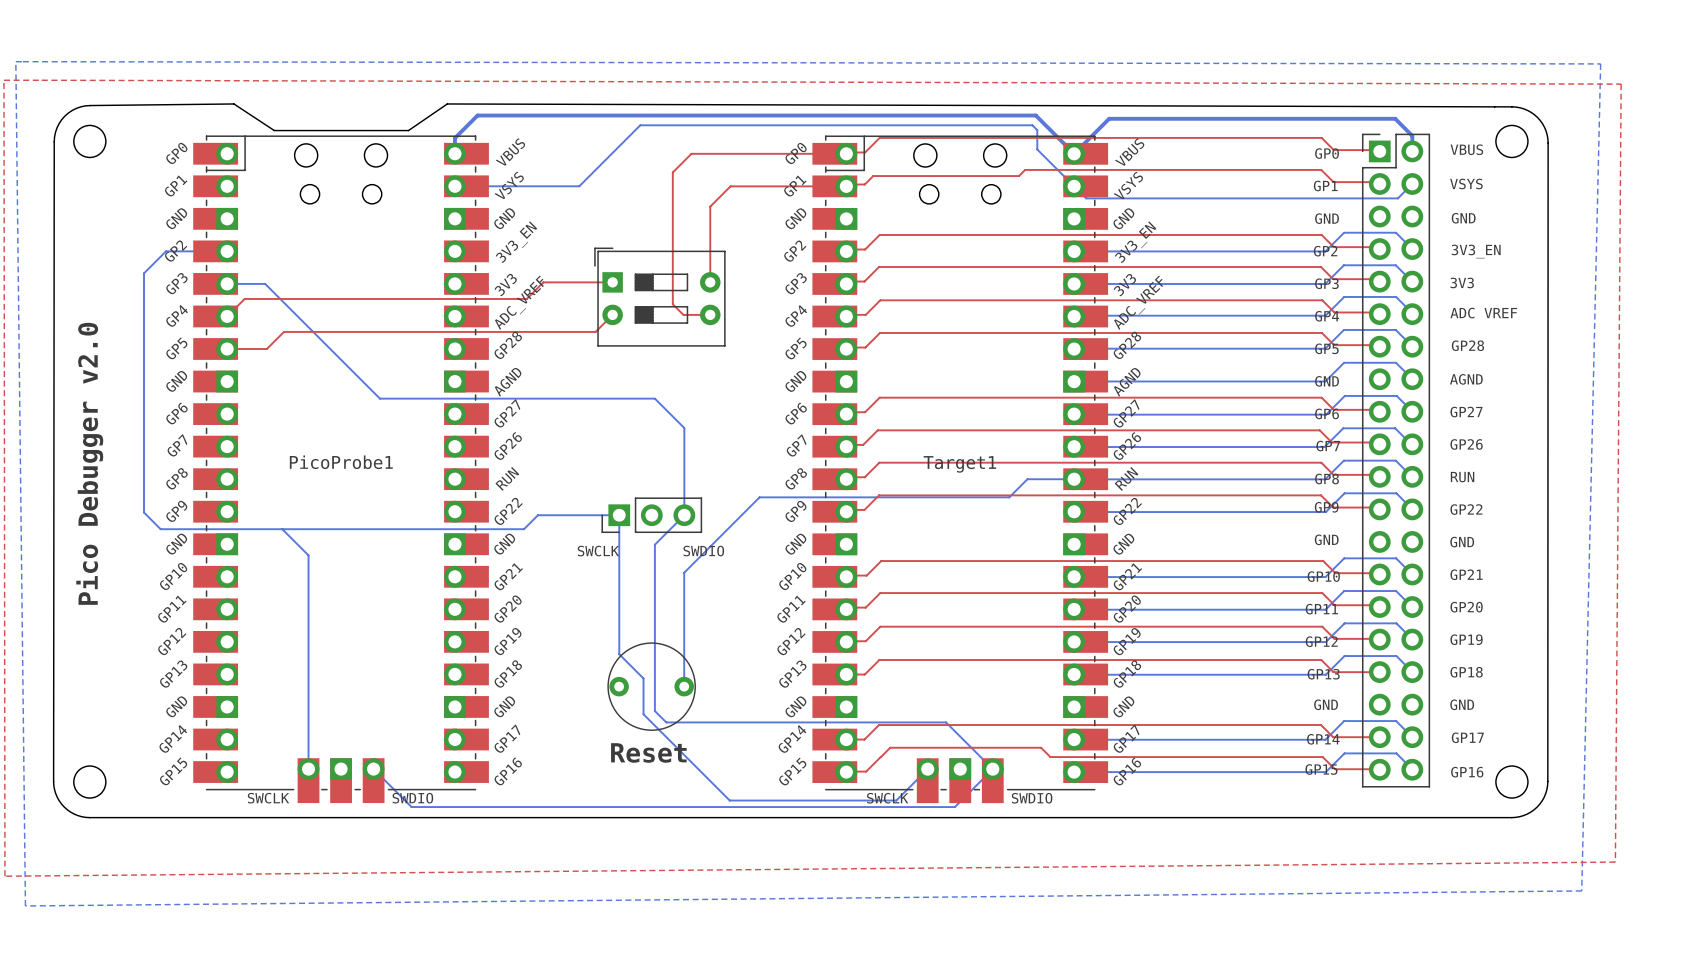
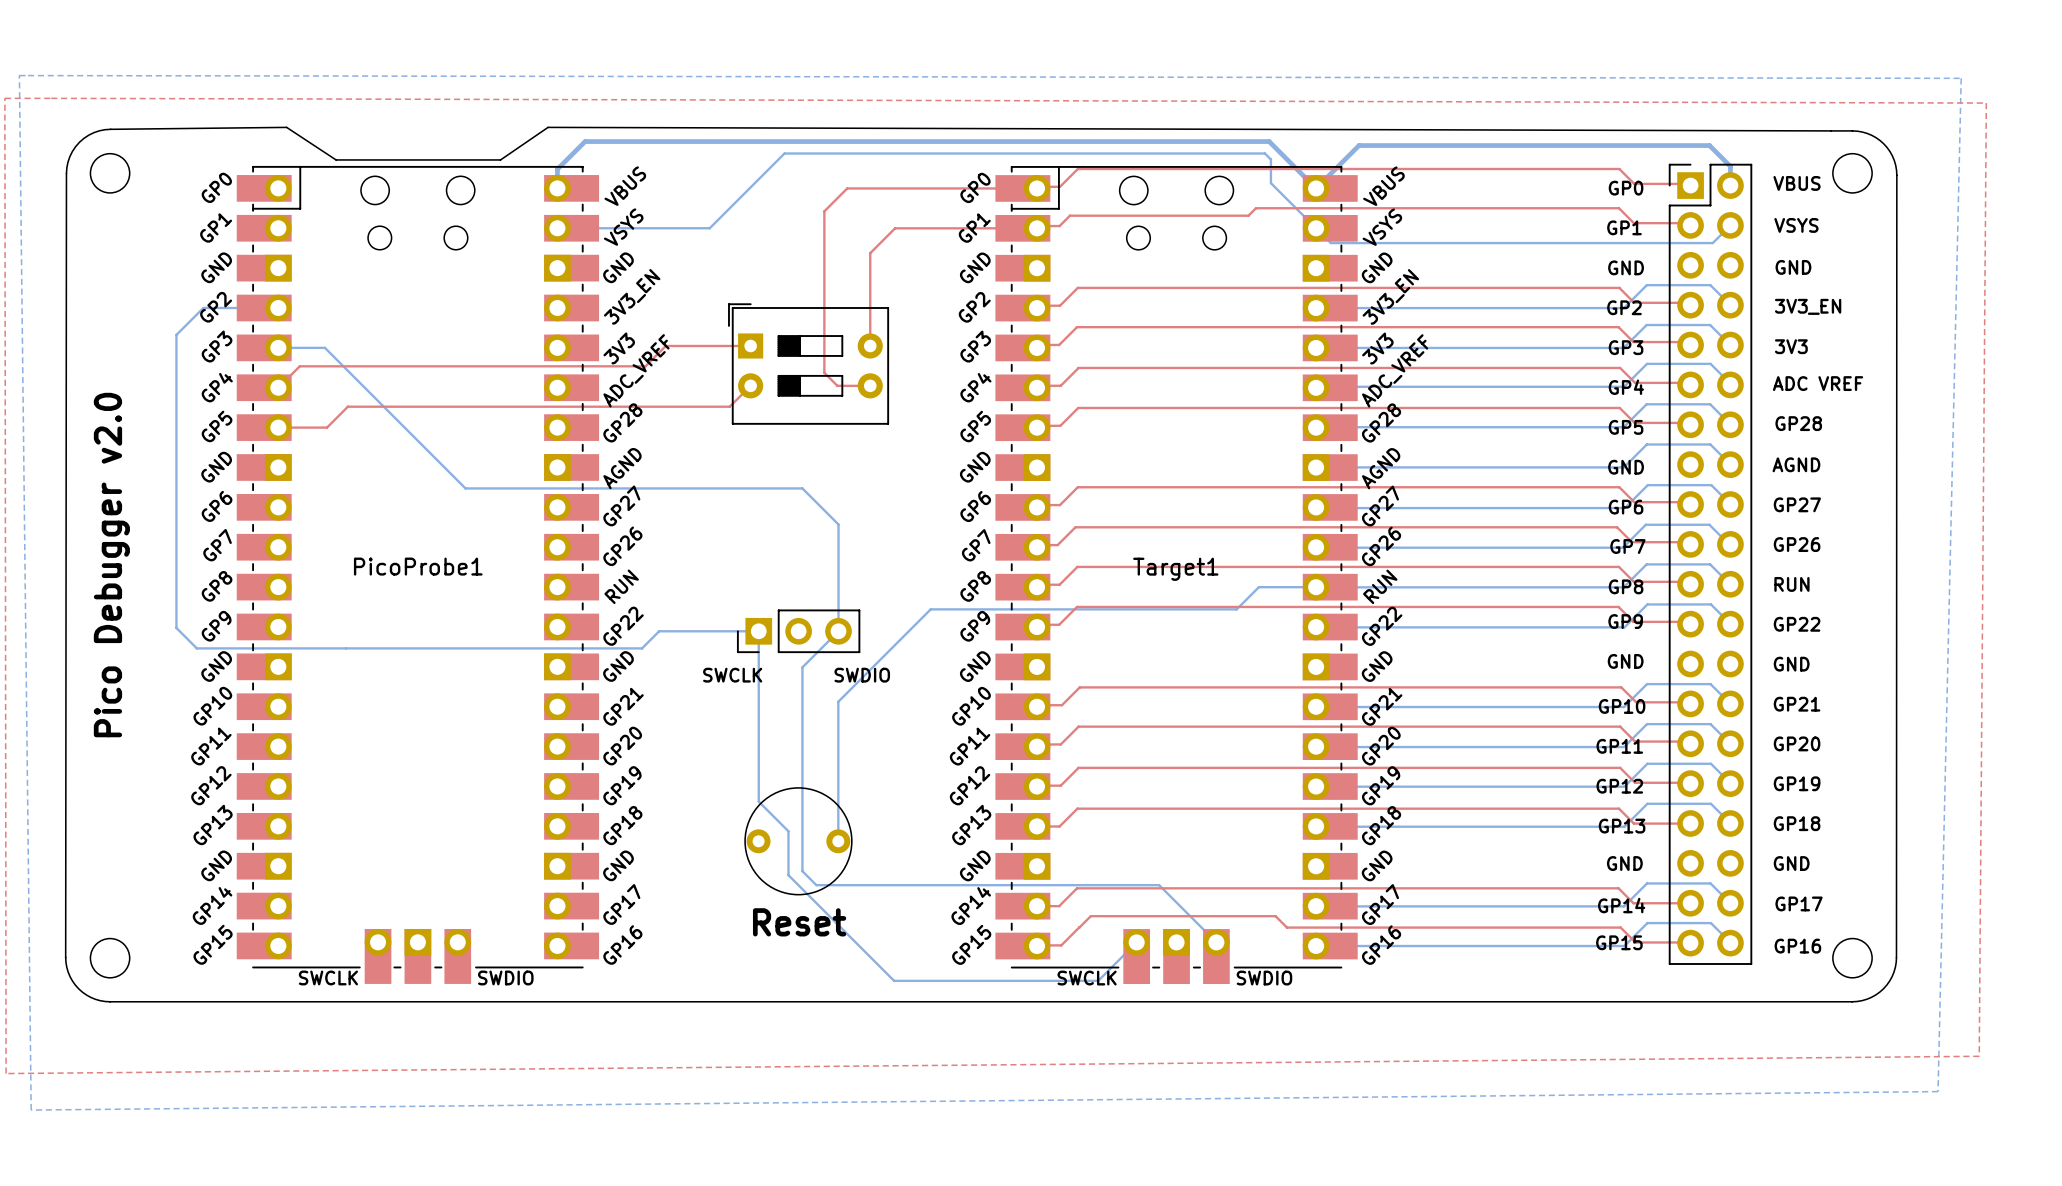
bottom track: (282, 529) (308, 555) (308, 769) -> none
bottom track: (373, 769) (411, 807) (954, 807) (992, 769) -> none

